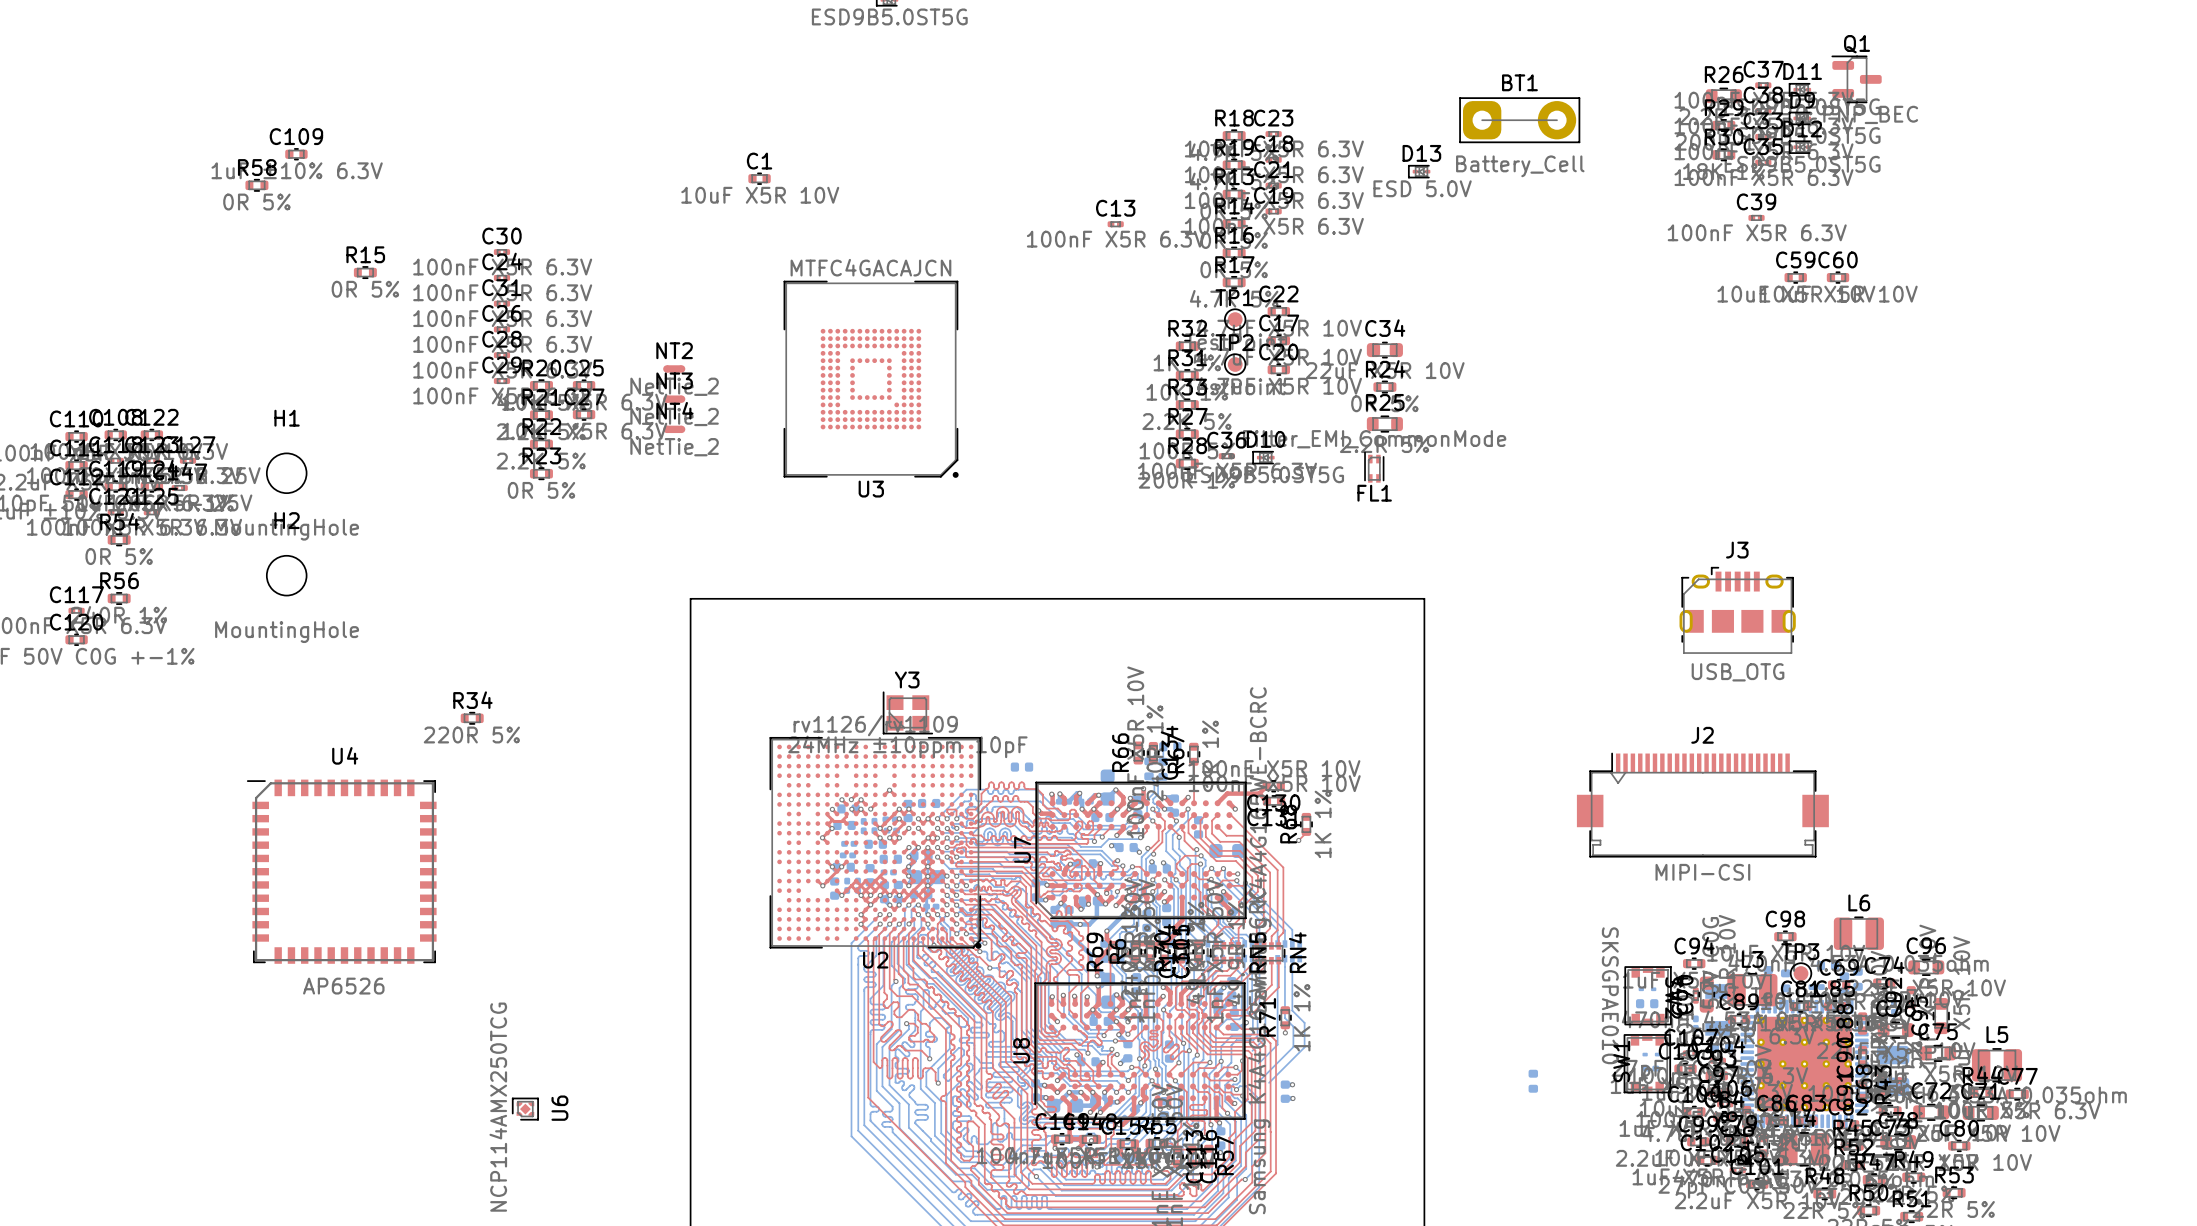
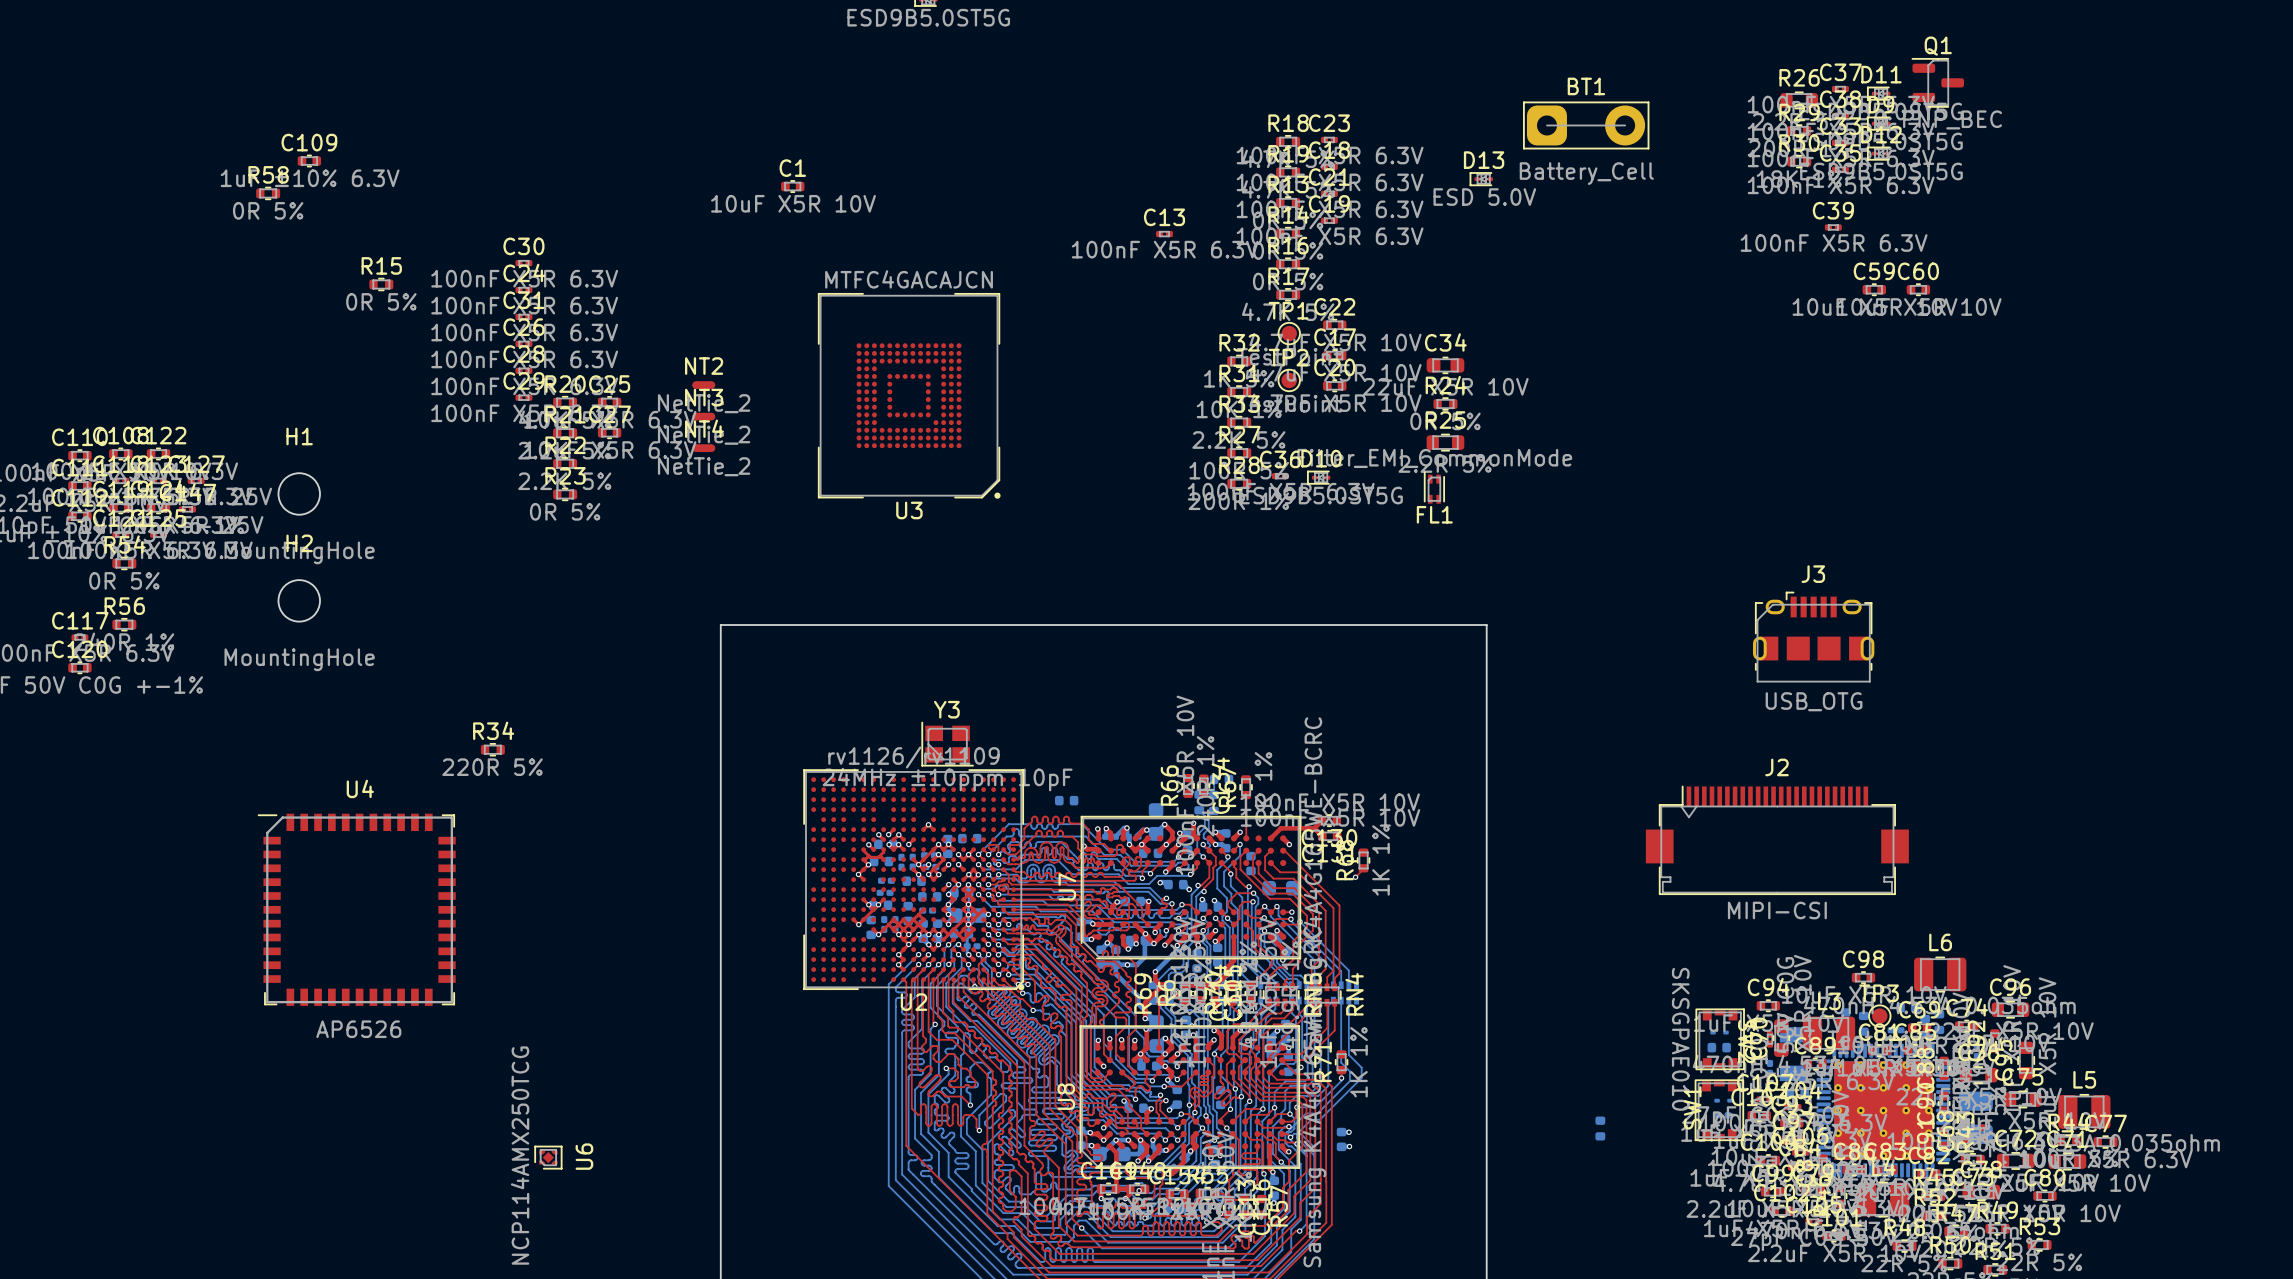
bottom track: (1277, 958) (1277, 1044) (1258, 1063) -> (1333, 1000) (1328, 1005) (1328, 1085) (1318, 1095) (1296, 1095) (1289, 1102) (1289, 1114)
bottom track: none -> (1341, 1078) (1341, 1080) (1315, 1107) (1296, 1107)
bottom track: (1304, 1032) (1304, 1047) (1269, 1082) -> (1361, 1077) (1319, 1119) (1311, 1119) (1297, 1133) (1297, 1138) (1314, 1155)
bottom track: (1293, 1035) (1293, 1047) (1258, 1082) -> (1349, 1081) (1317, 1113) (1306, 1113) (1288, 1131) (1288, 1137) (1306, 1156)

